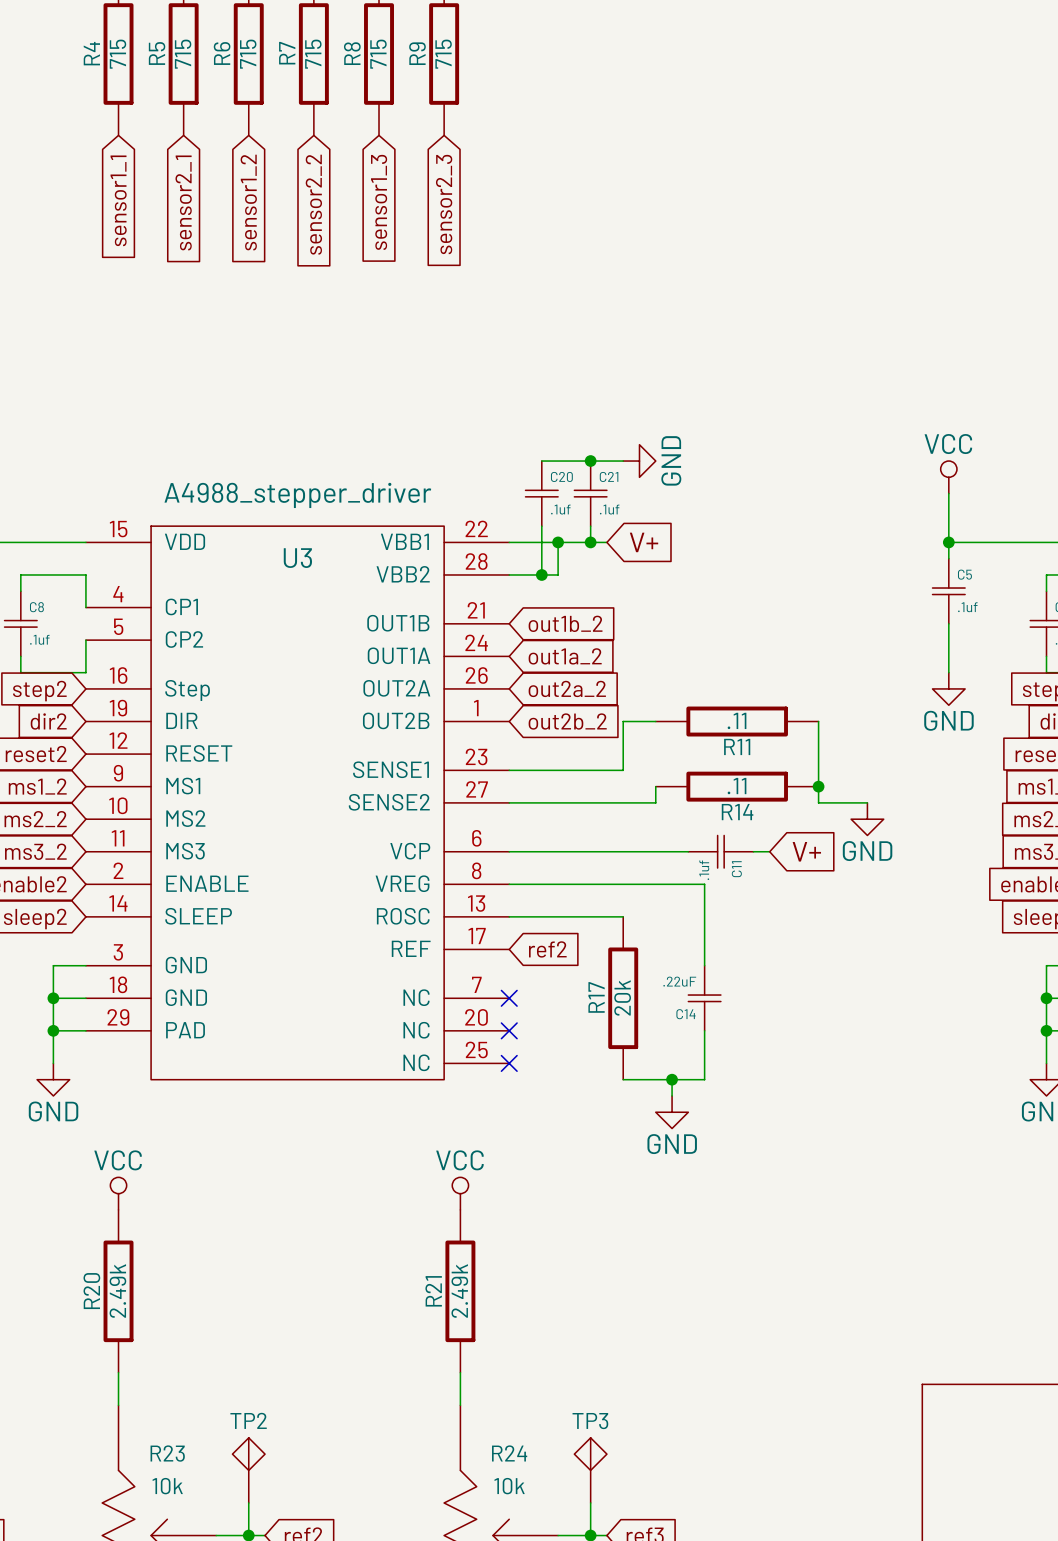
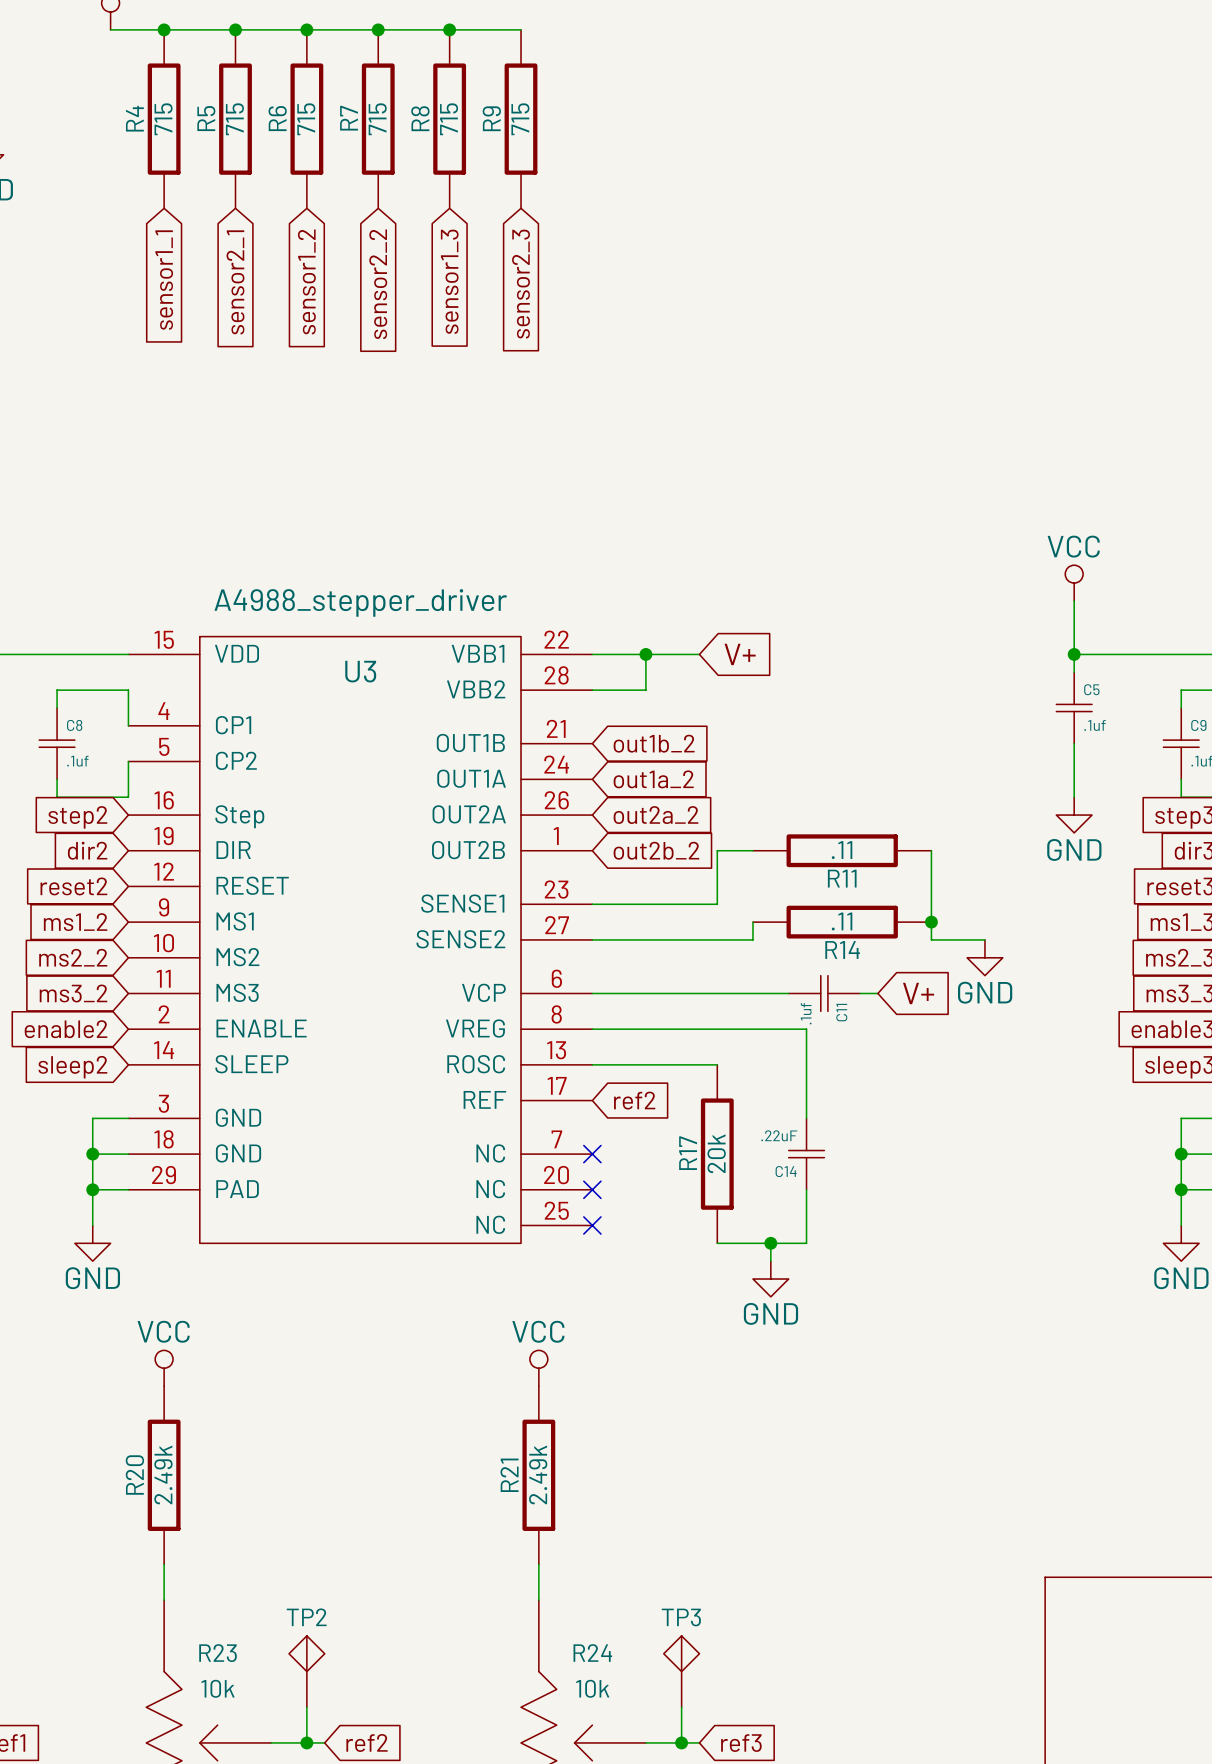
wire: (541, 461) (623, 461) -> none
junction: (590, 461) -> none
power symbol: GND (639, 461) -> none
C20: .1uf (541, 493) -> none
C21: .1uf (590, 493) -> none
wire: (541, 526) (541, 574) -> none
wire: (590, 526) (590, 542) -> none
junction: (590, 542) -> none
junction: (541, 574) -> none

